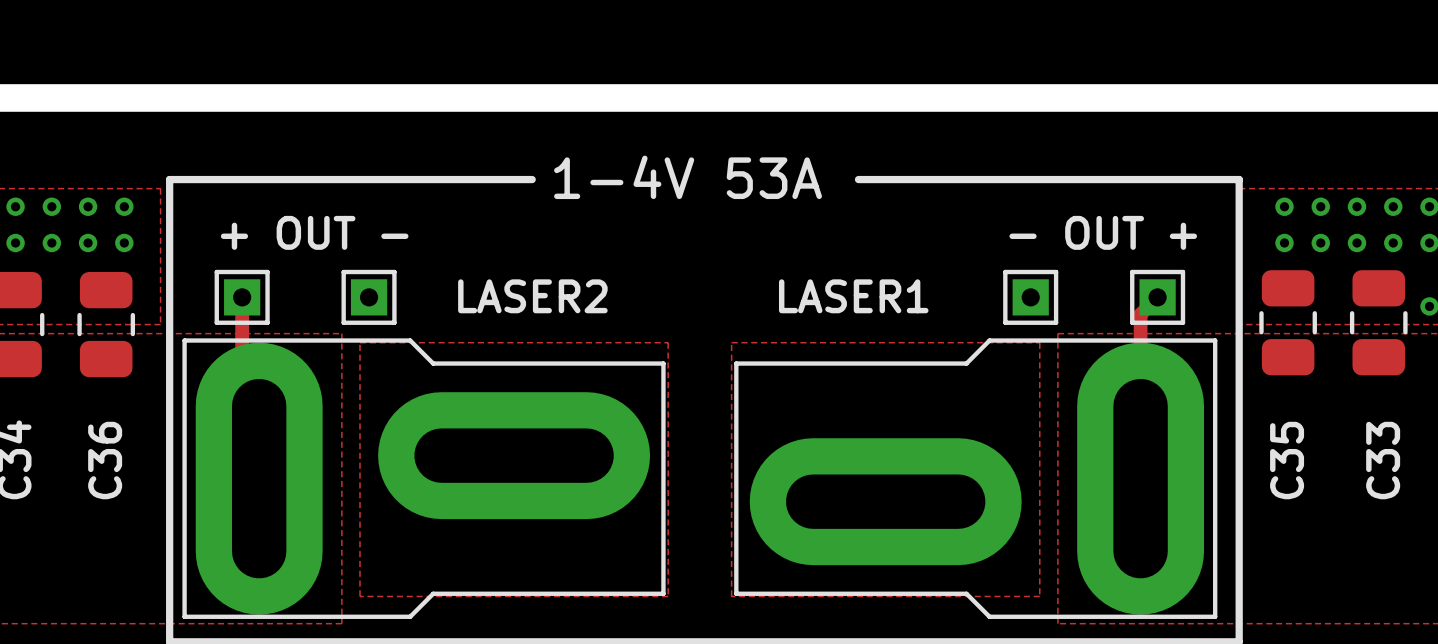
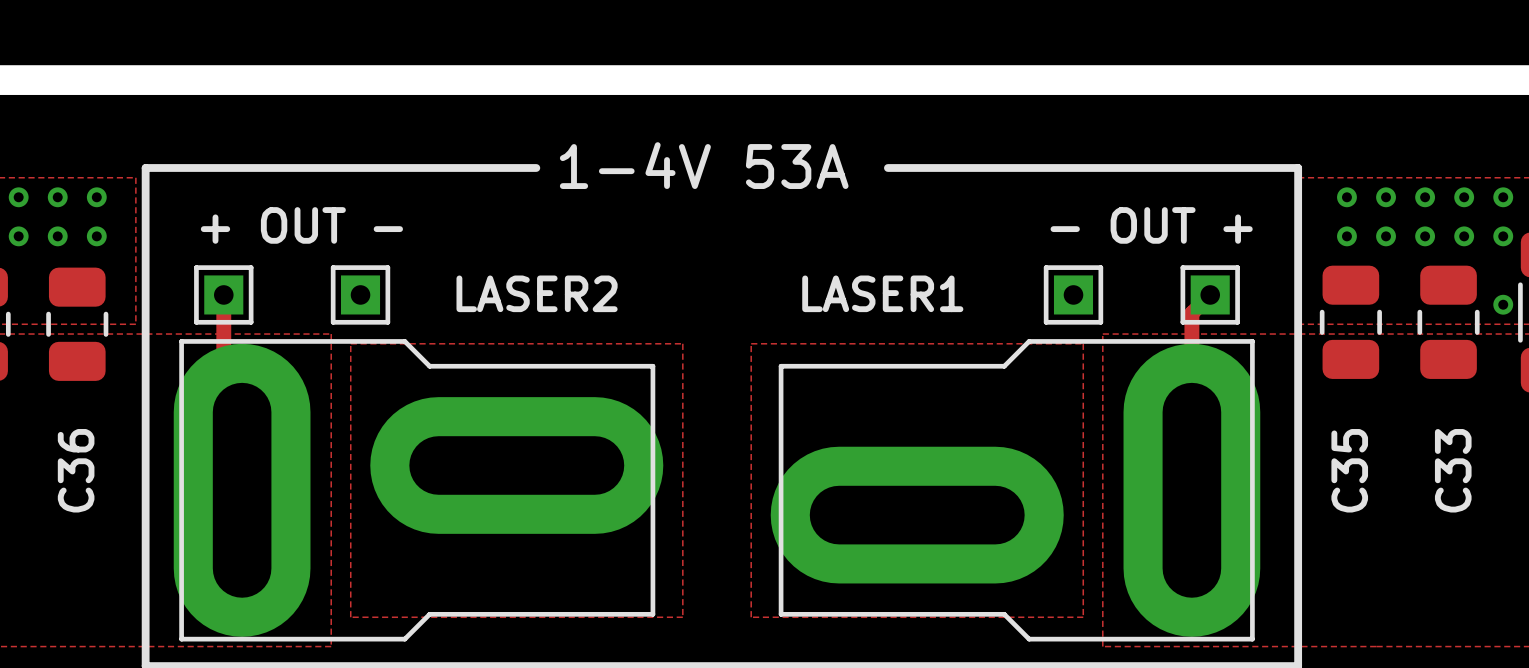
LASER2 footprint: [182, 338, 666, 619] -> [173, 339, 664, 642]
LASER1 footprint: [734, 338, 1218, 619] -> [770, 339, 1261, 642]

